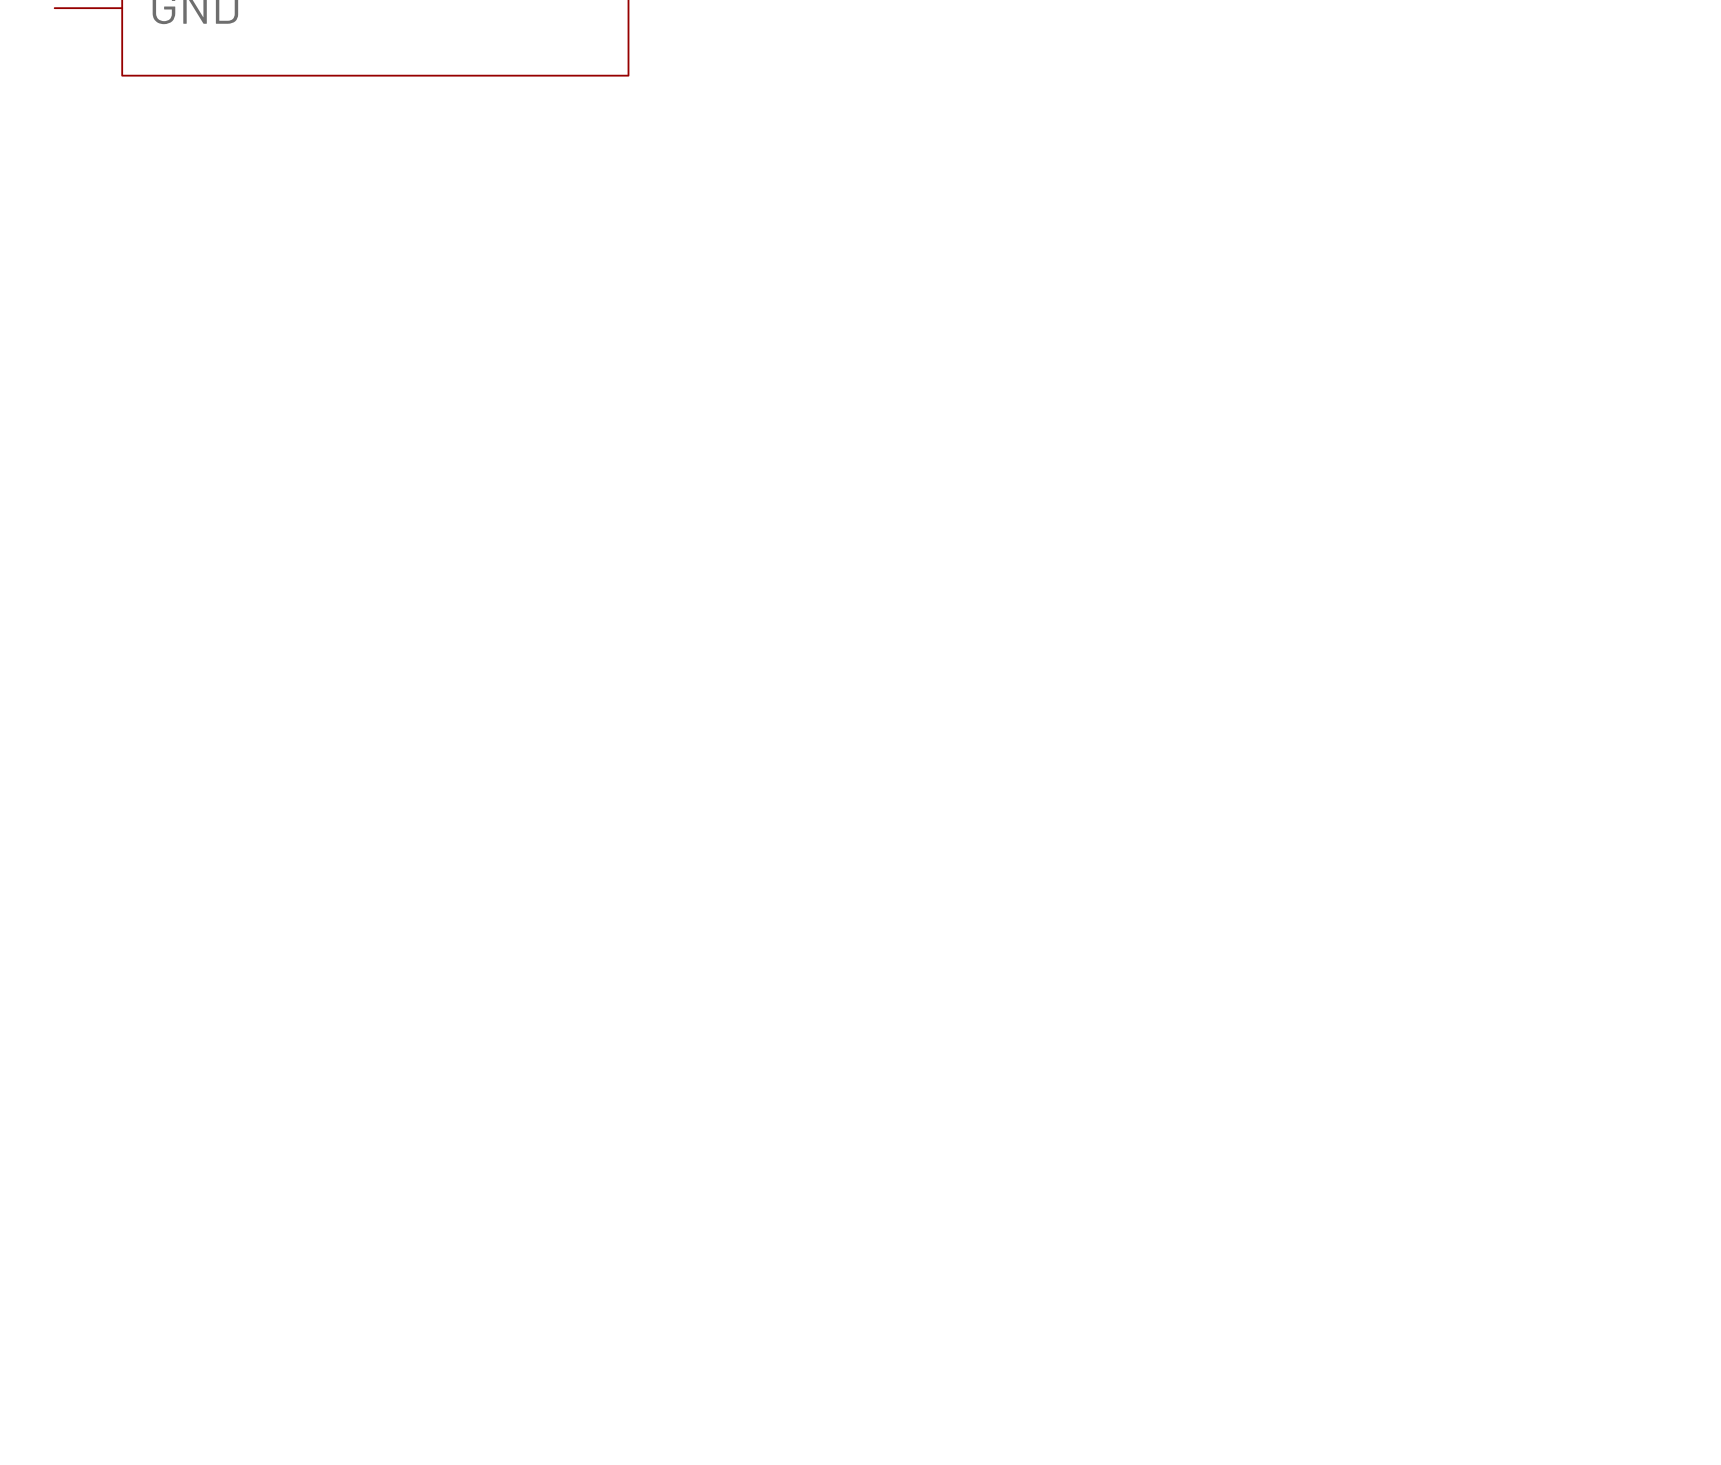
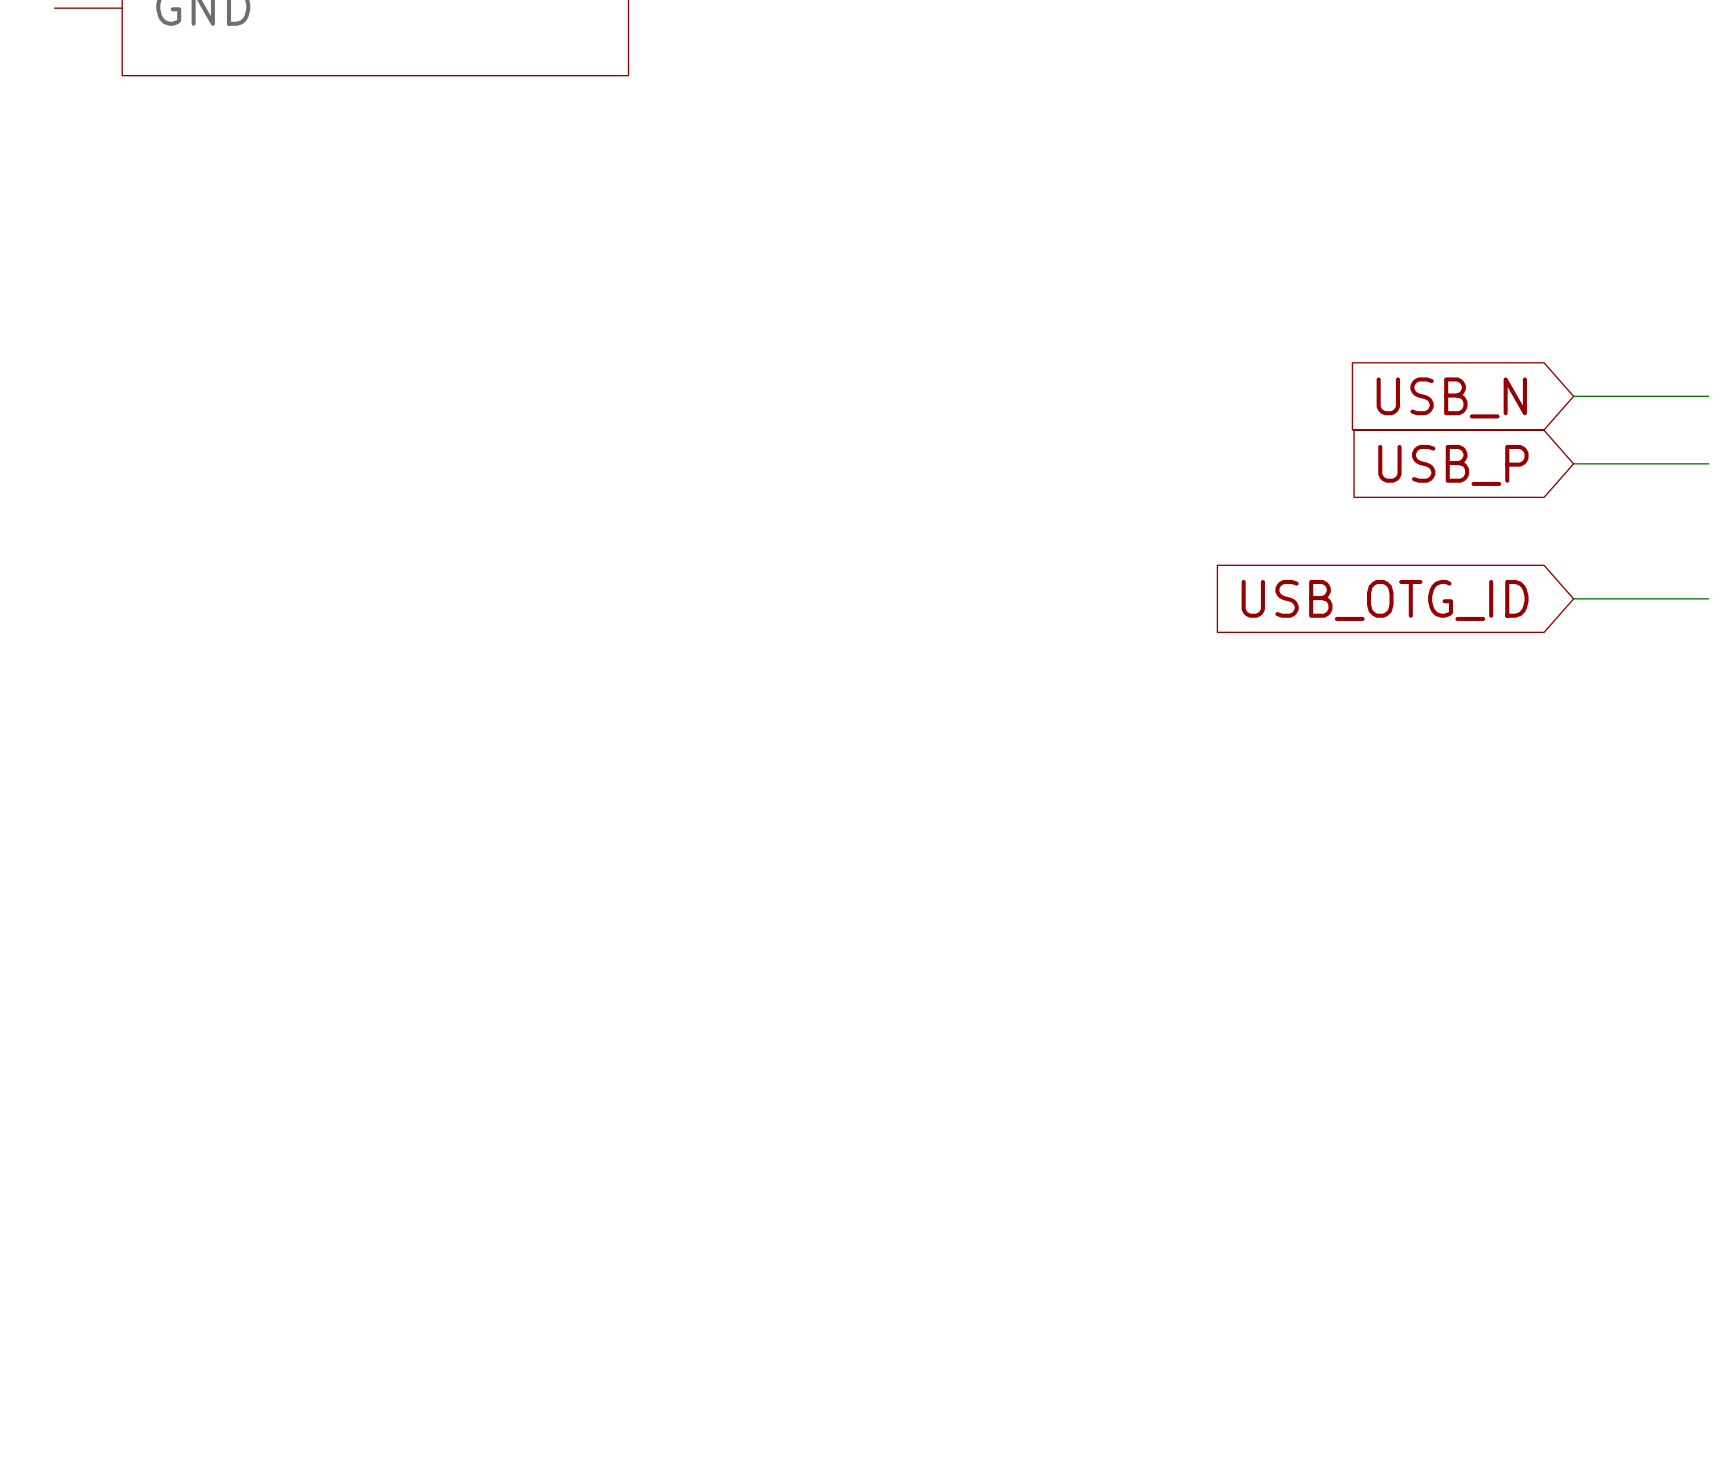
global label: none -> USB_N (1451, 397)
wire: none -> (1573, 396) (1708, 396)
global label: none -> USB_P (1453, 465)
wire: none -> (1573, 463) (1708, 463)
global label: none -> USB_OTG_ID (1385, 600)
wire: none -> (1573, 598) (1708, 598)

